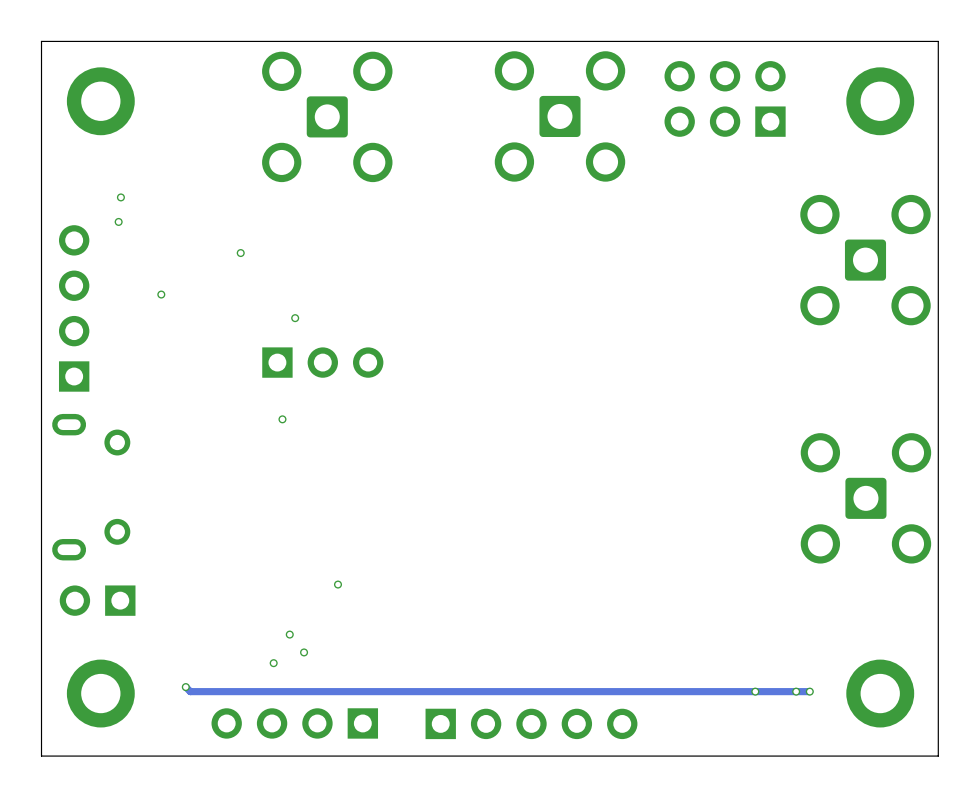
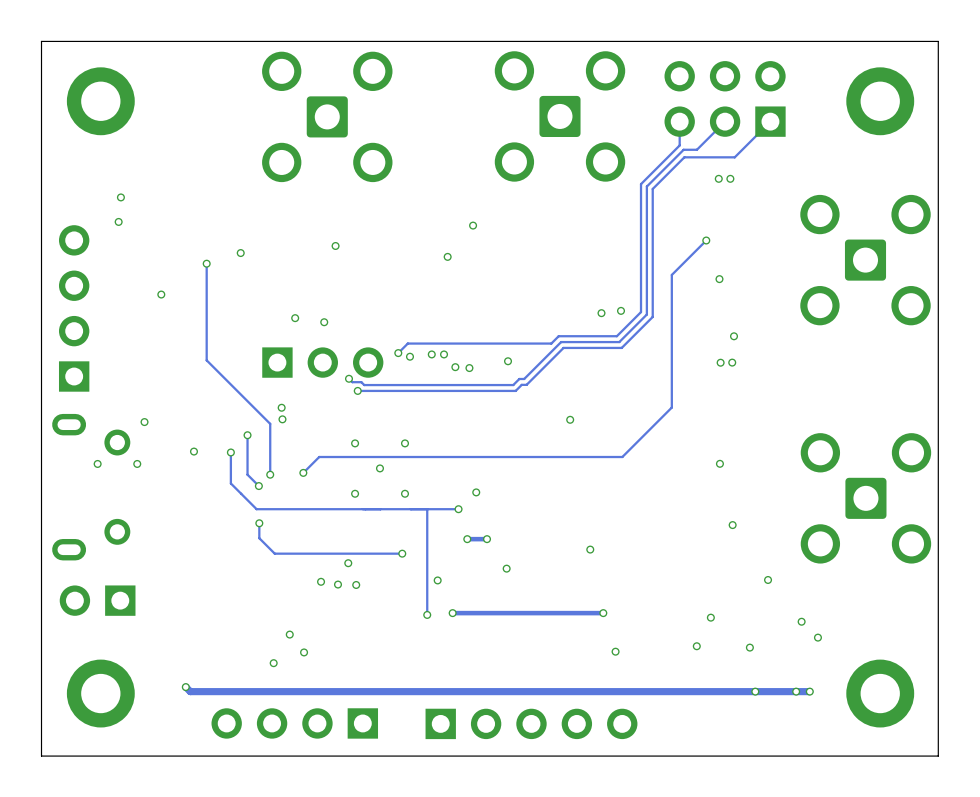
track: none -> (679, 121) (679, 145) (641, 184) (641, 312) (616, 336) (558, 336) (551, 343) (407, 343) (398, 353)
track: none -> (725, 121) (696, 149) (683, 149) (646, 186) (646, 314) (619, 342) (561, 342) (524, 379) (519, 379) (513, 385) (364, 385) (361, 382) (352, 382) (349, 378)
track: none -> (770, 121) (734, 157) (684, 157) (652, 188) (652, 316) (621, 347) (563, 347) (526, 384) (521, 384) (515, 390) (357, 390)
via: none -> (718, 178)
via: none -> (730, 178)
via: none -> (473, 225)
track: none -> (706, 240) (671, 274) (671, 407) (622, 457) (319, 457) (303, 472)
via: none -> (706, 240)
via: none -> (335, 245)
via: none -> (447, 256)
track: none -> (206, 263) (206, 360) (270, 423) (270, 474)
via: none -> (206, 263)
via: none -> (719, 279)
via: none -> (621, 310)
via: none -> (601, 313)
via: none -> (324, 322)
via: none -> (734, 336)
via: none -> (398, 353)
via: none -> (431, 354)
via: none -> (444, 354)
via: none -> (409, 356)
via: none -> (508, 361)
via: none -> (720, 362)
via: none -> (732, 362)
via: none -> (455, 367)
via: none -> (469, 368)
via: none -> (349, 378)
via: none -> (357, 390)
via: none -> (281, 407)
via: none -> (570, 419)
via: none -> (144, 422)
track: none -> (247, 435) (247, 474) (258, 486)
via: none -> (247, 435)
via: none -> (355, 443)
via: none -> (405, 443)
via: none -> (193, 451)
track: none -> (230, 452) (230, 483) (256, 509) (458, 509)
via: none -> (230, 452)
via: none -> (97, 463)
via: none -> (137, 463)
via: none -> (719, 463)
via: none -> (379, 468)
via: none -> (303, 472)
via: none -> (270, 474)
via: none -> (258, 486)
via: none -> (476, 492)
via: none -> (355, 493)
via: none -> (405, 493)
track: none -> (427, 509) (427, 614)
via: none -> (458, 509)
track: none -> (259, 523) (259, 538) (274, 553) (402, 553)
via: none -> (259, 523)
via: none -> (732, 525)
via: none -> (467, 539)
track: none -> (487, 539) (467, 539)
via: none -> (487, 539)
via: none -> (590, 549)
via: none -> (402, 553)
via: none -> (348, 563)
via: none -> (506, 568)
via: none -> (768, 579)
via: none -> (437, 580)
via: none -> (321, 581)
via: none -> (356, 584)
via: none -> (452, 613)
track: none -> (603, 613) (452, 613)
via: none -> (603, 613)
via: none -> (427, 614)
via: none -> (710, 617)
via: none -> (801, 621)
via: none -> (817, 637)
via: none -> (696, 646)
via: none -> (749, 647)
via: none -> (615, 651)

